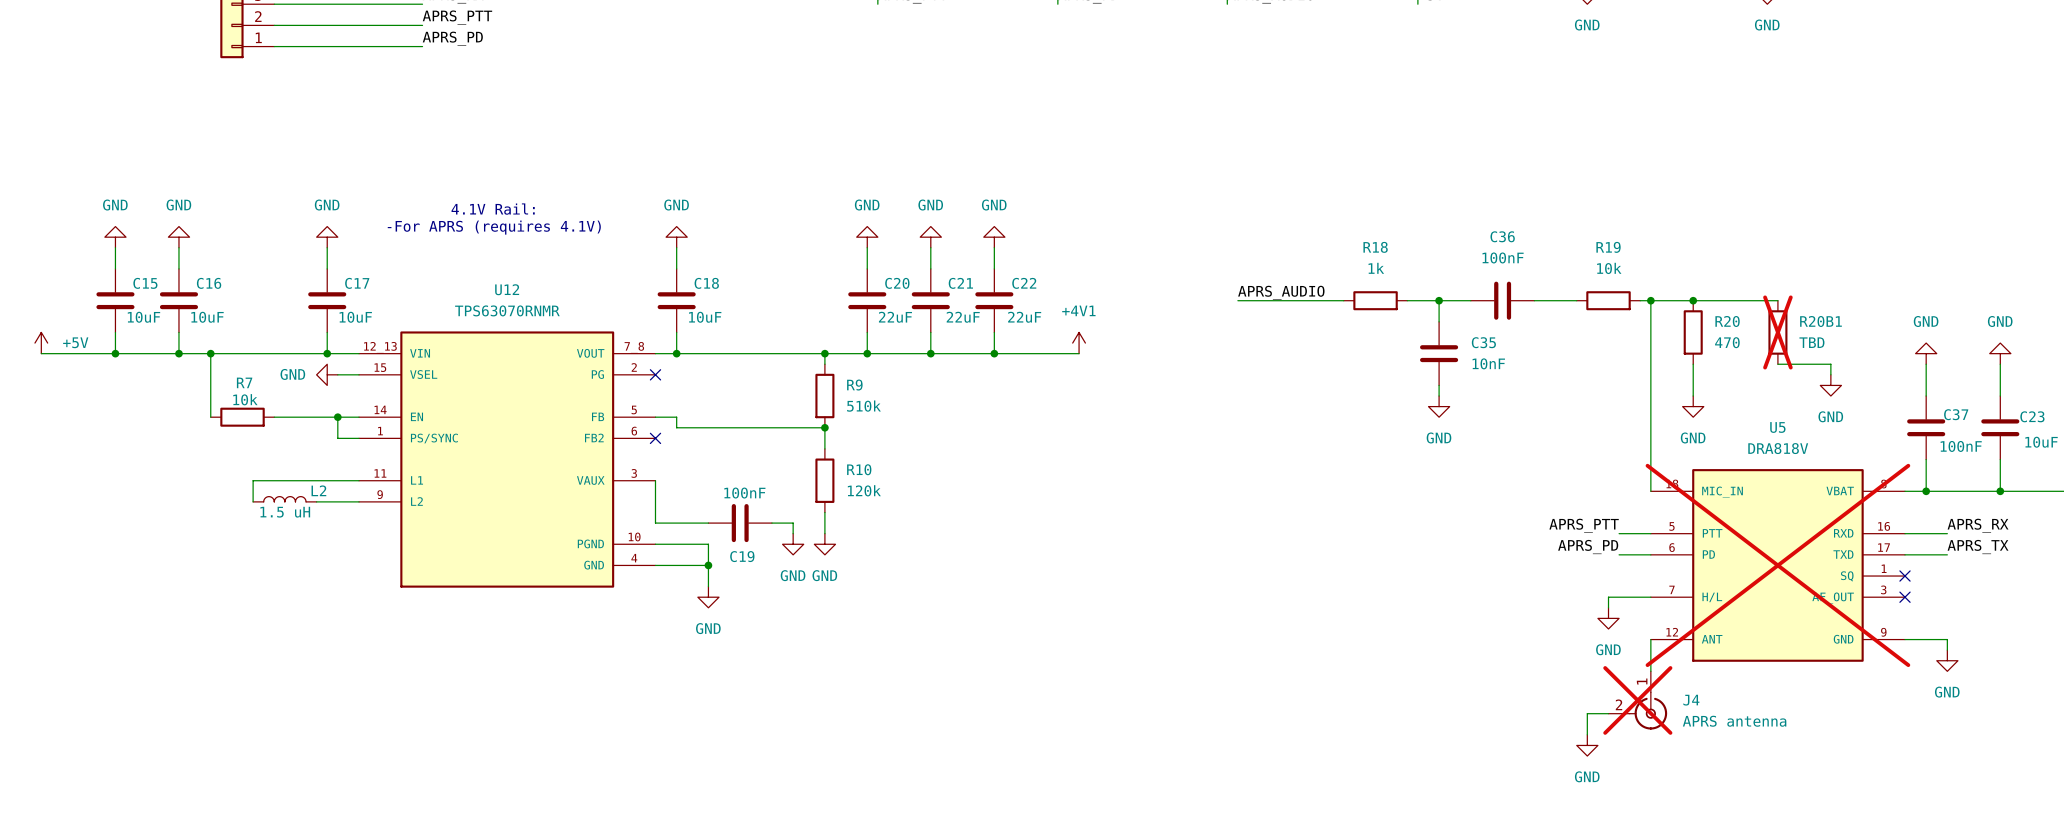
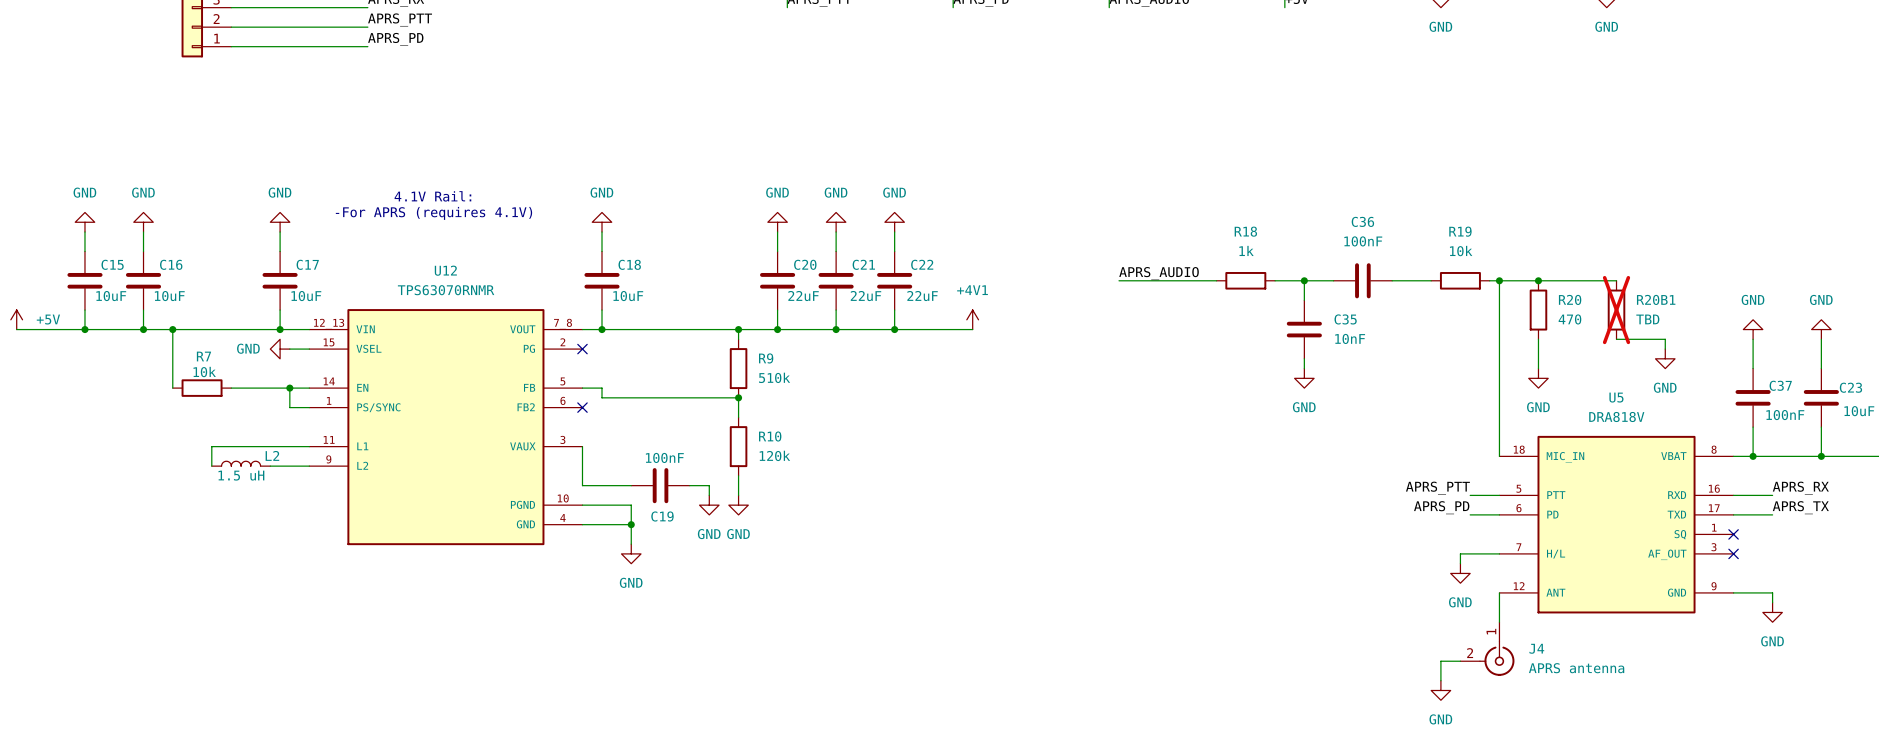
U5 do-not-place cross: (1777, 565) -> none
J4 do-not-place cross: (1637, 700) -> none

